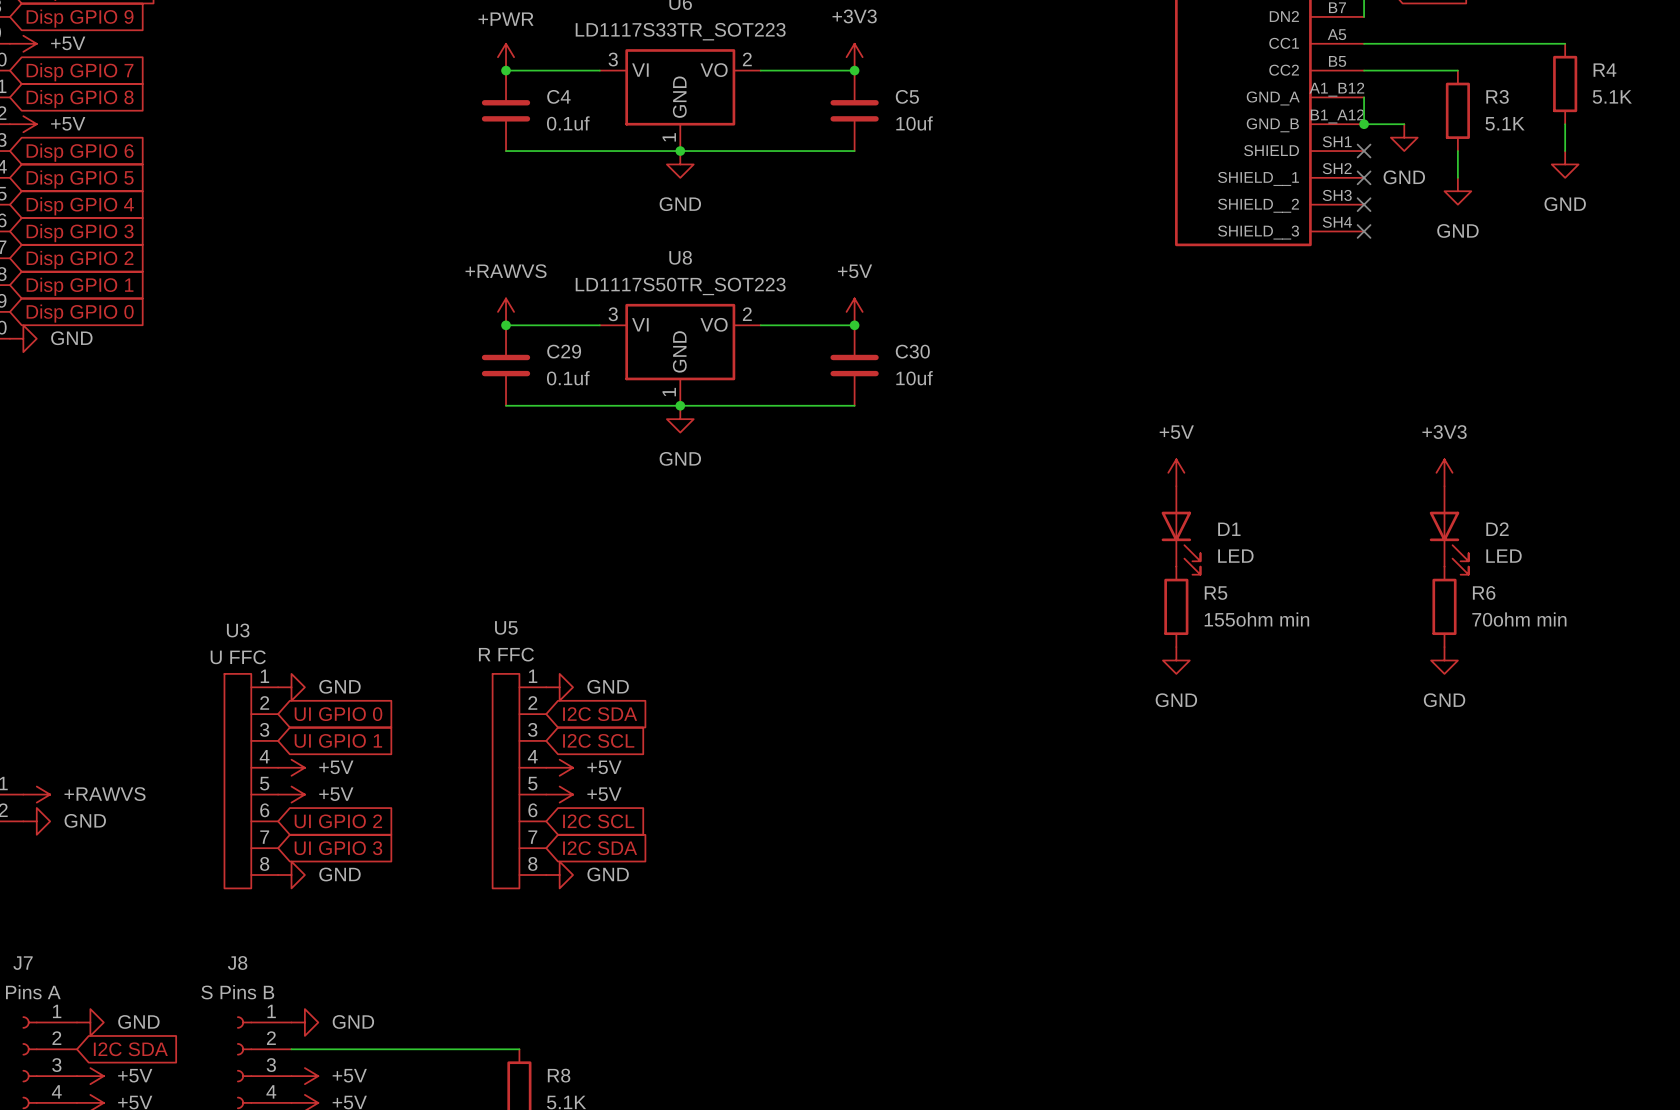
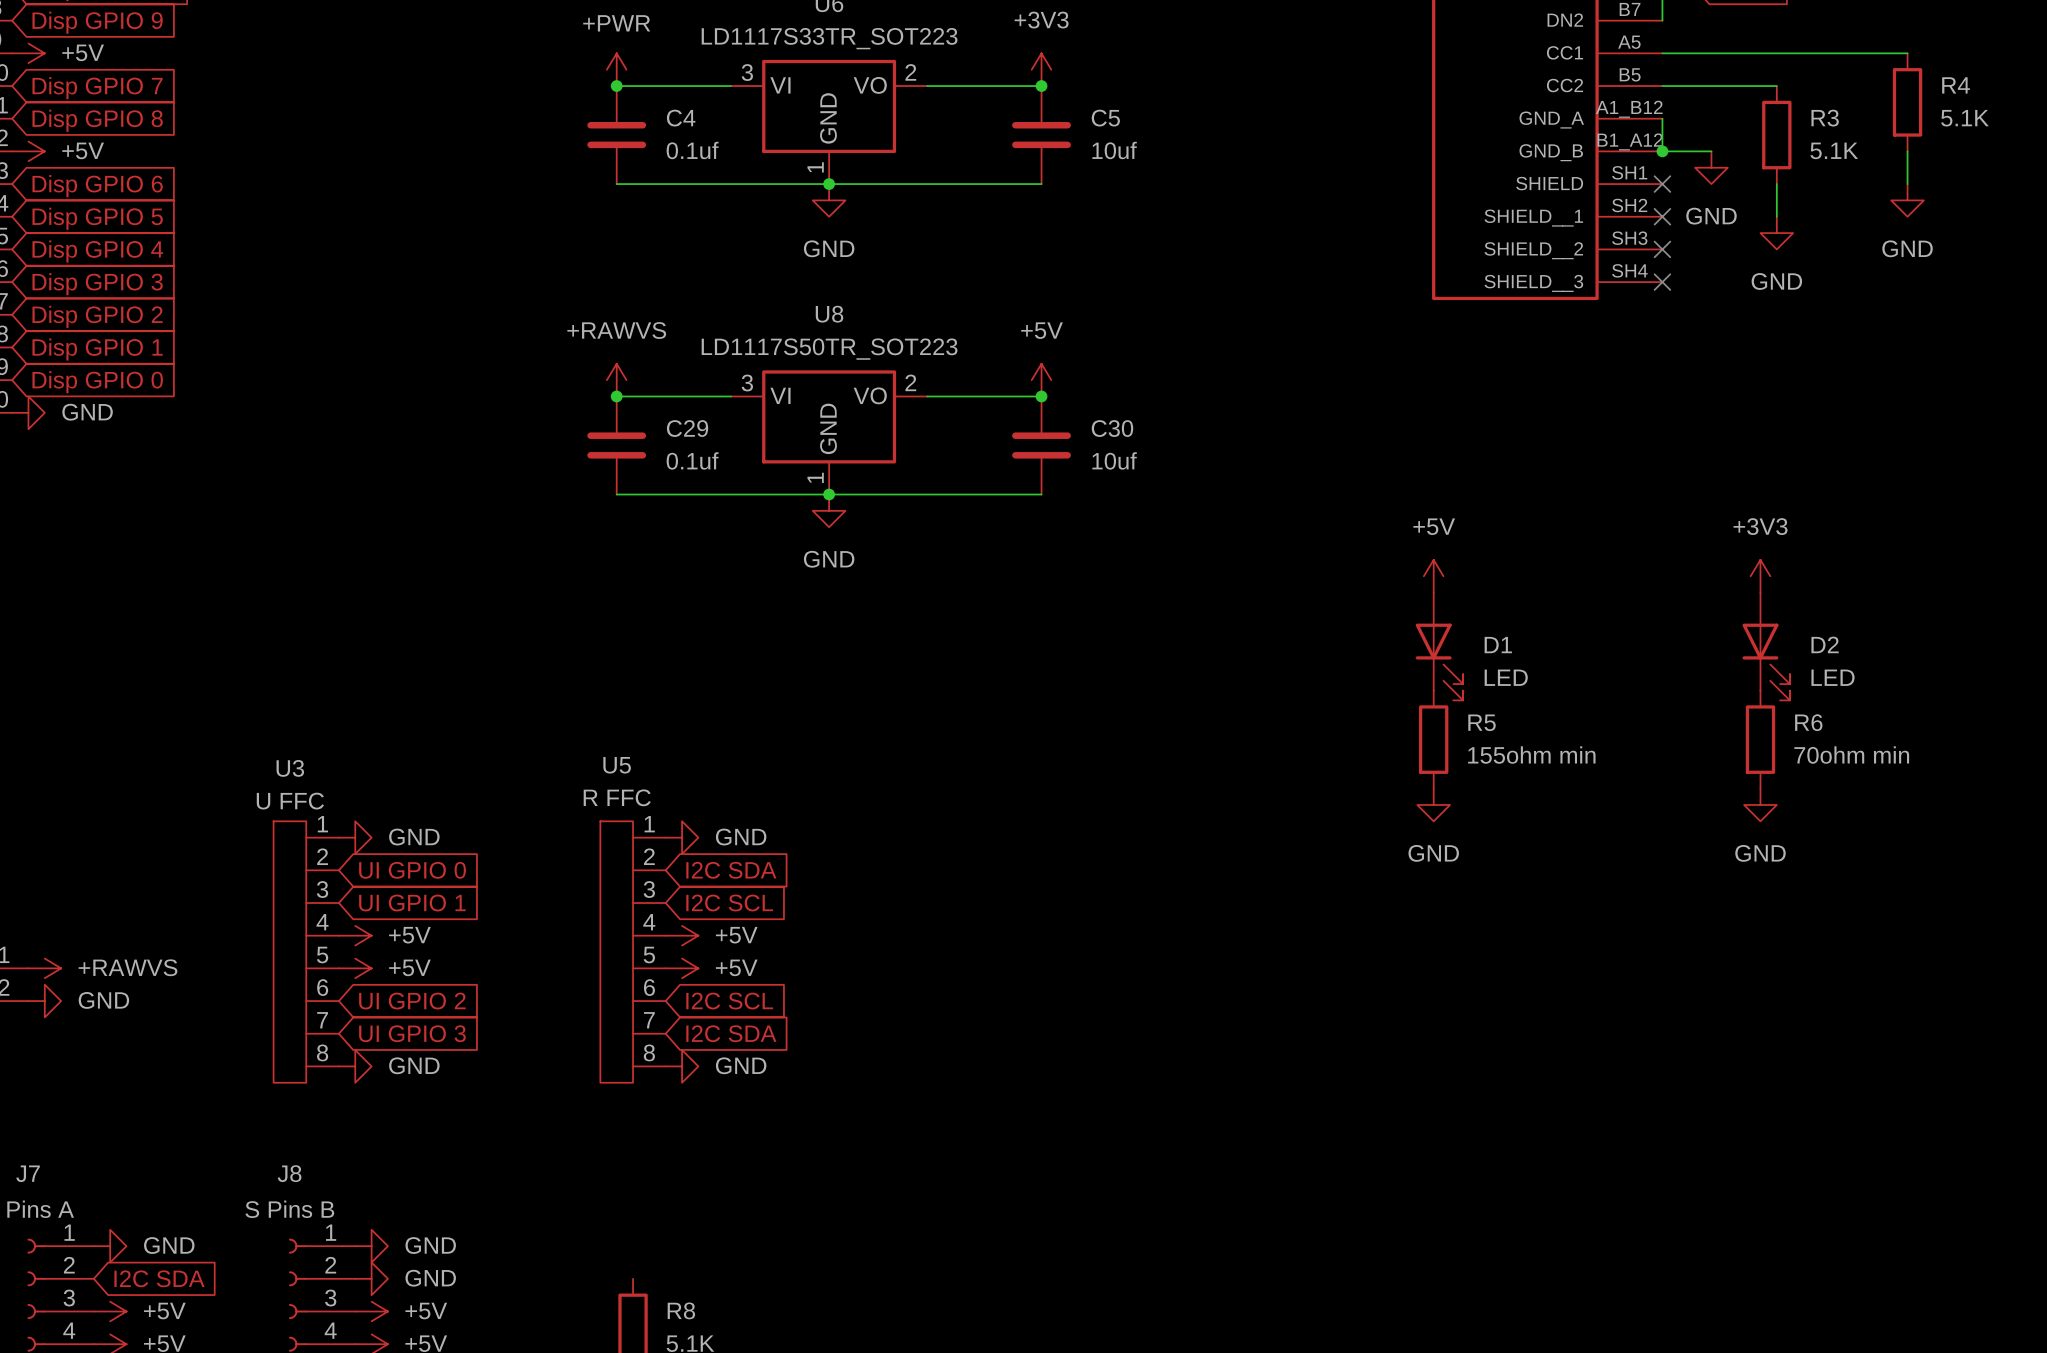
wire: (291, 1049) (519, 1049) -> none
power symbol: none -> GND (371, 1278)

